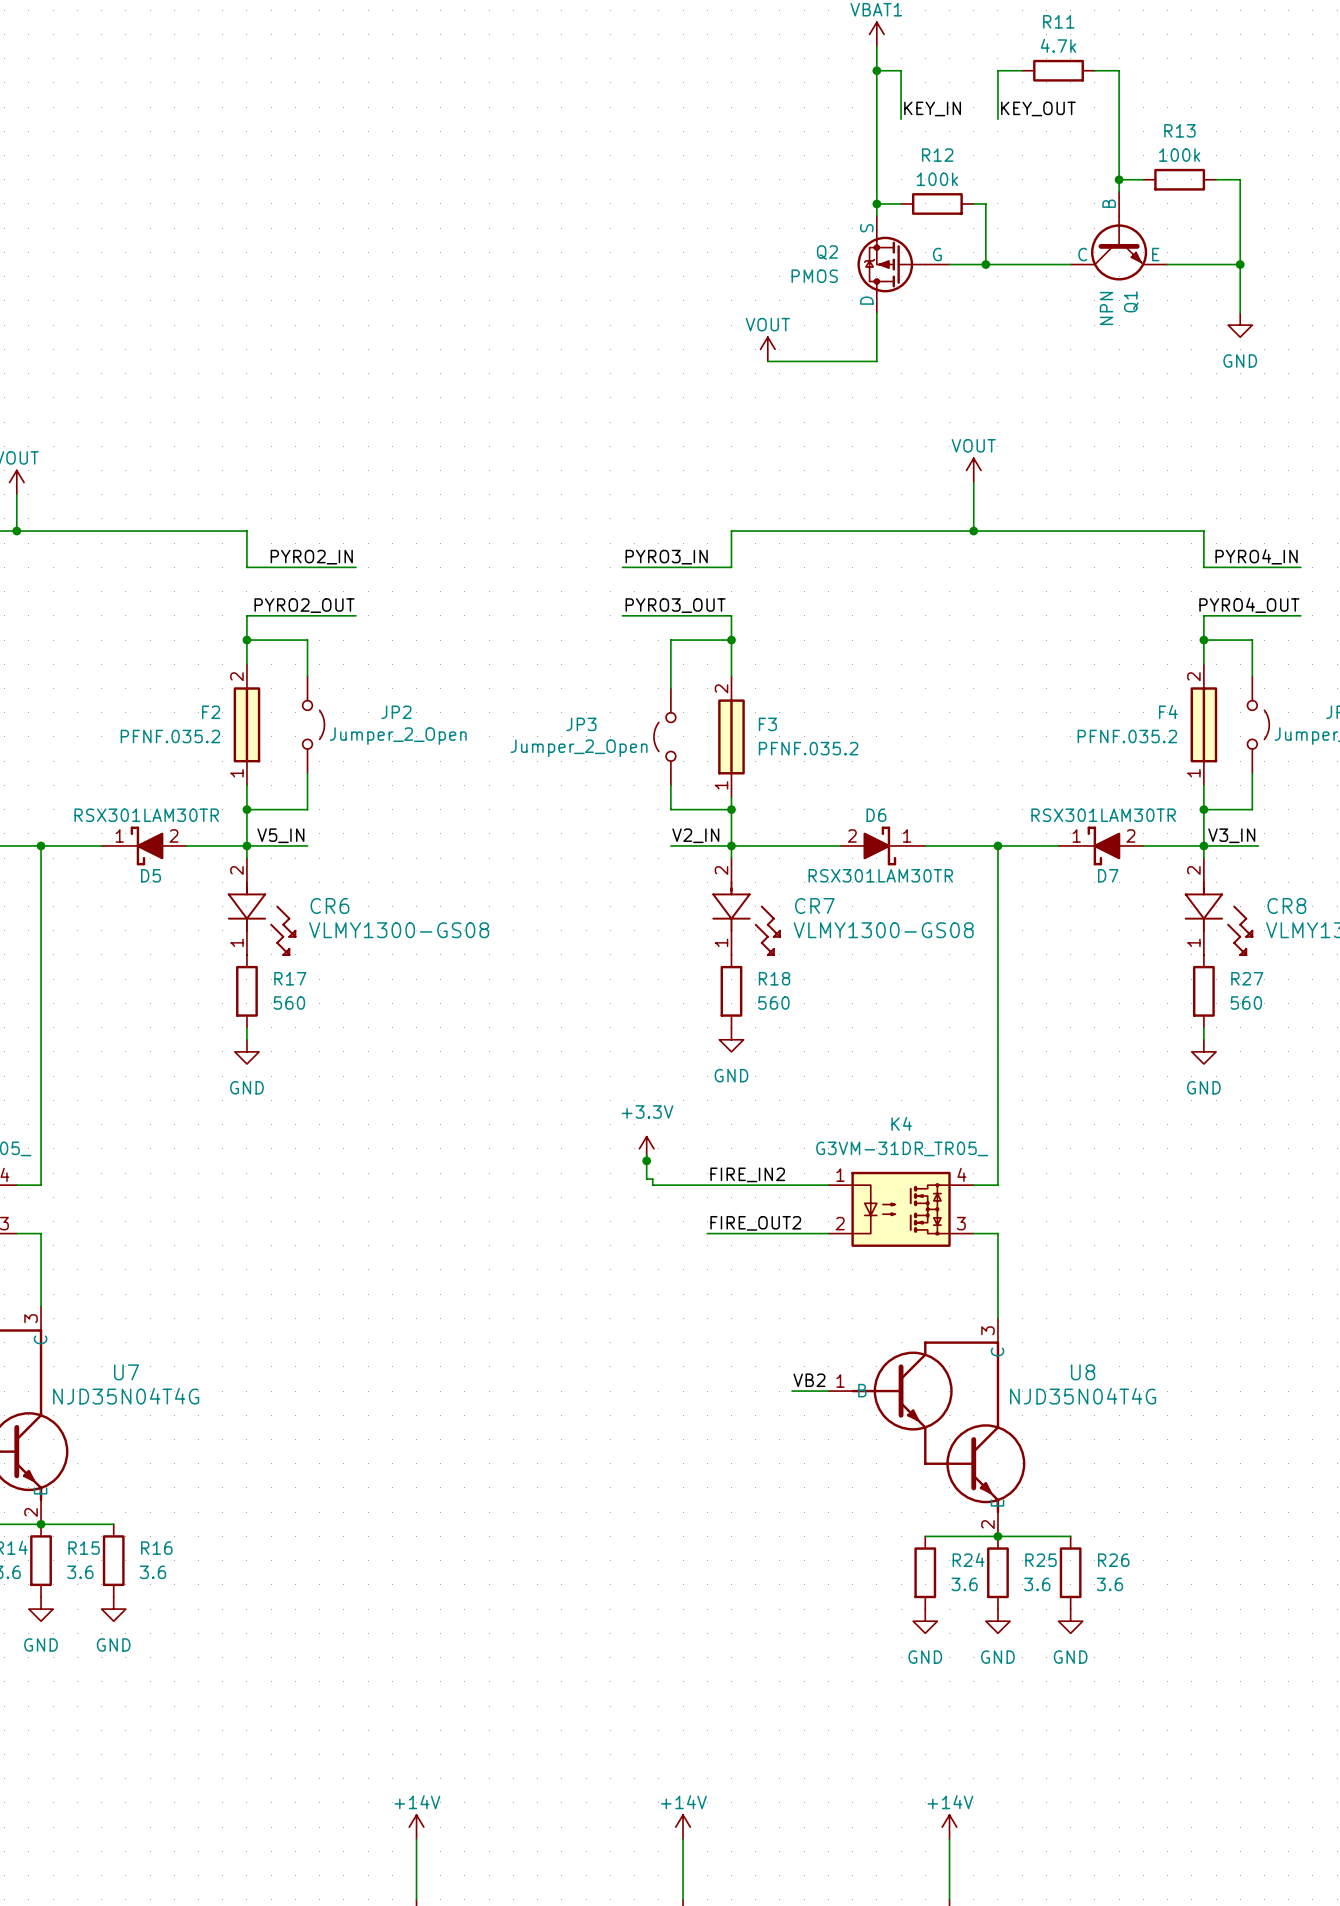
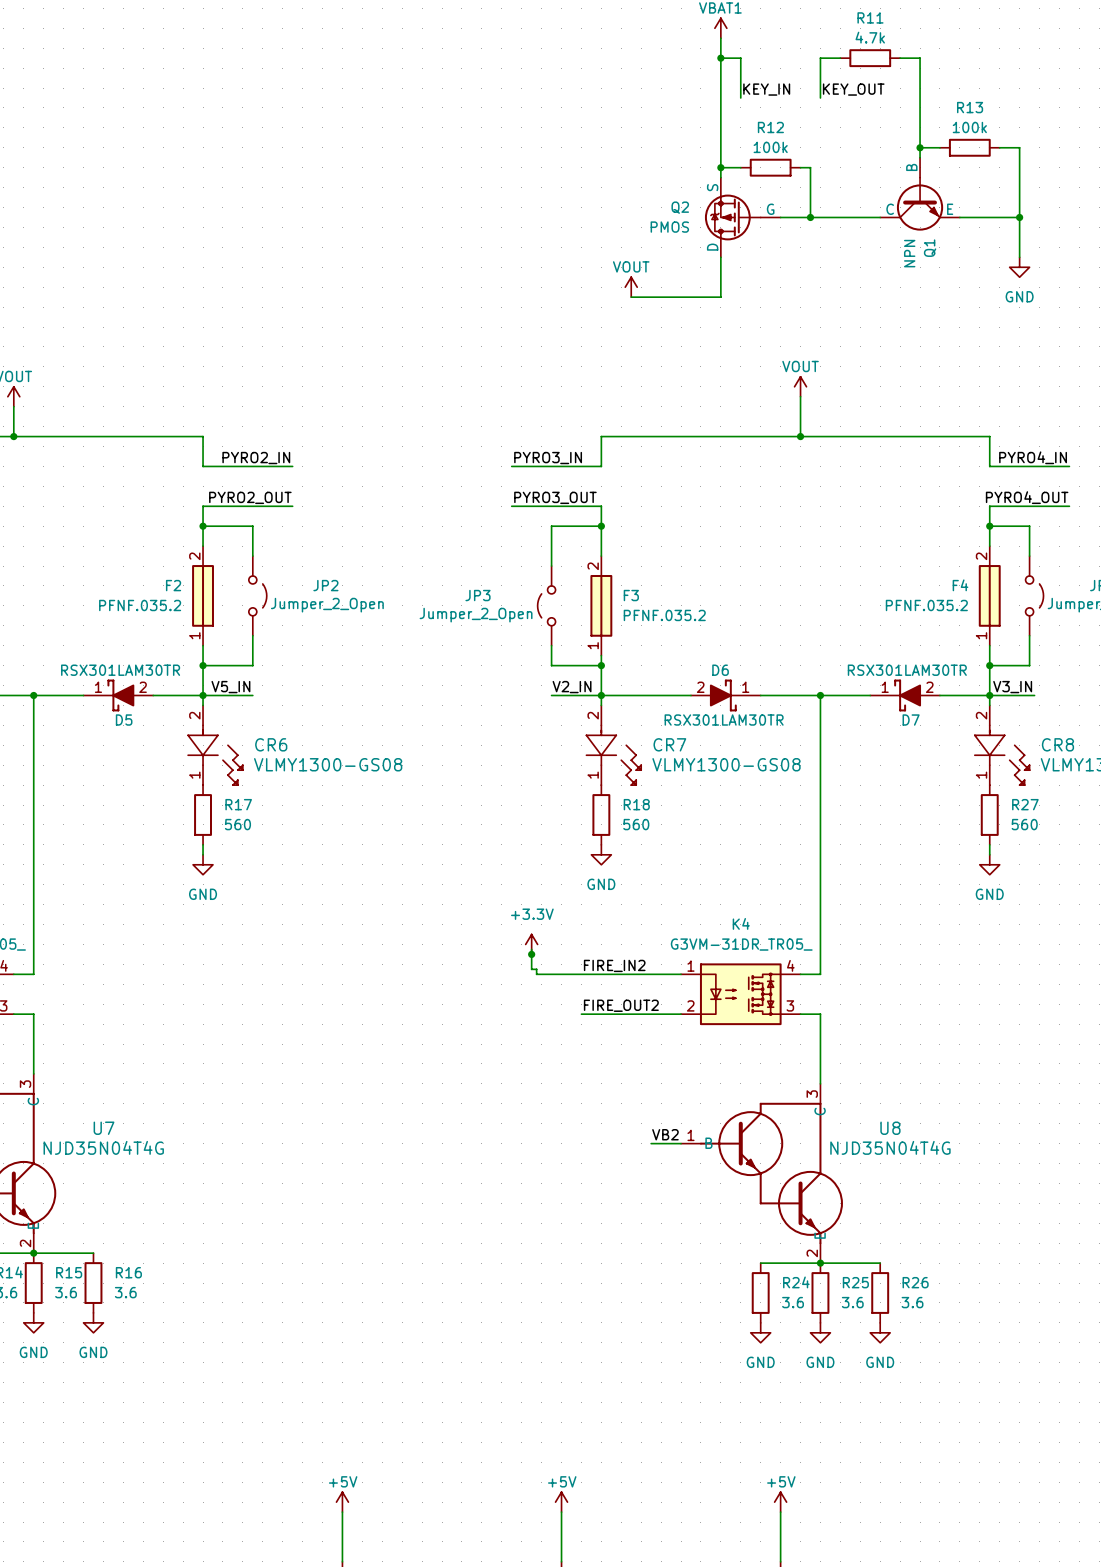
power symbol: +14V (416, 1827) -> +5V (342, 1502)
power symbol: +14V (683, 1827) -> +5V (561, 1502)
power symbol: +14V (949, 1827) -> +5V (780, 1502)

